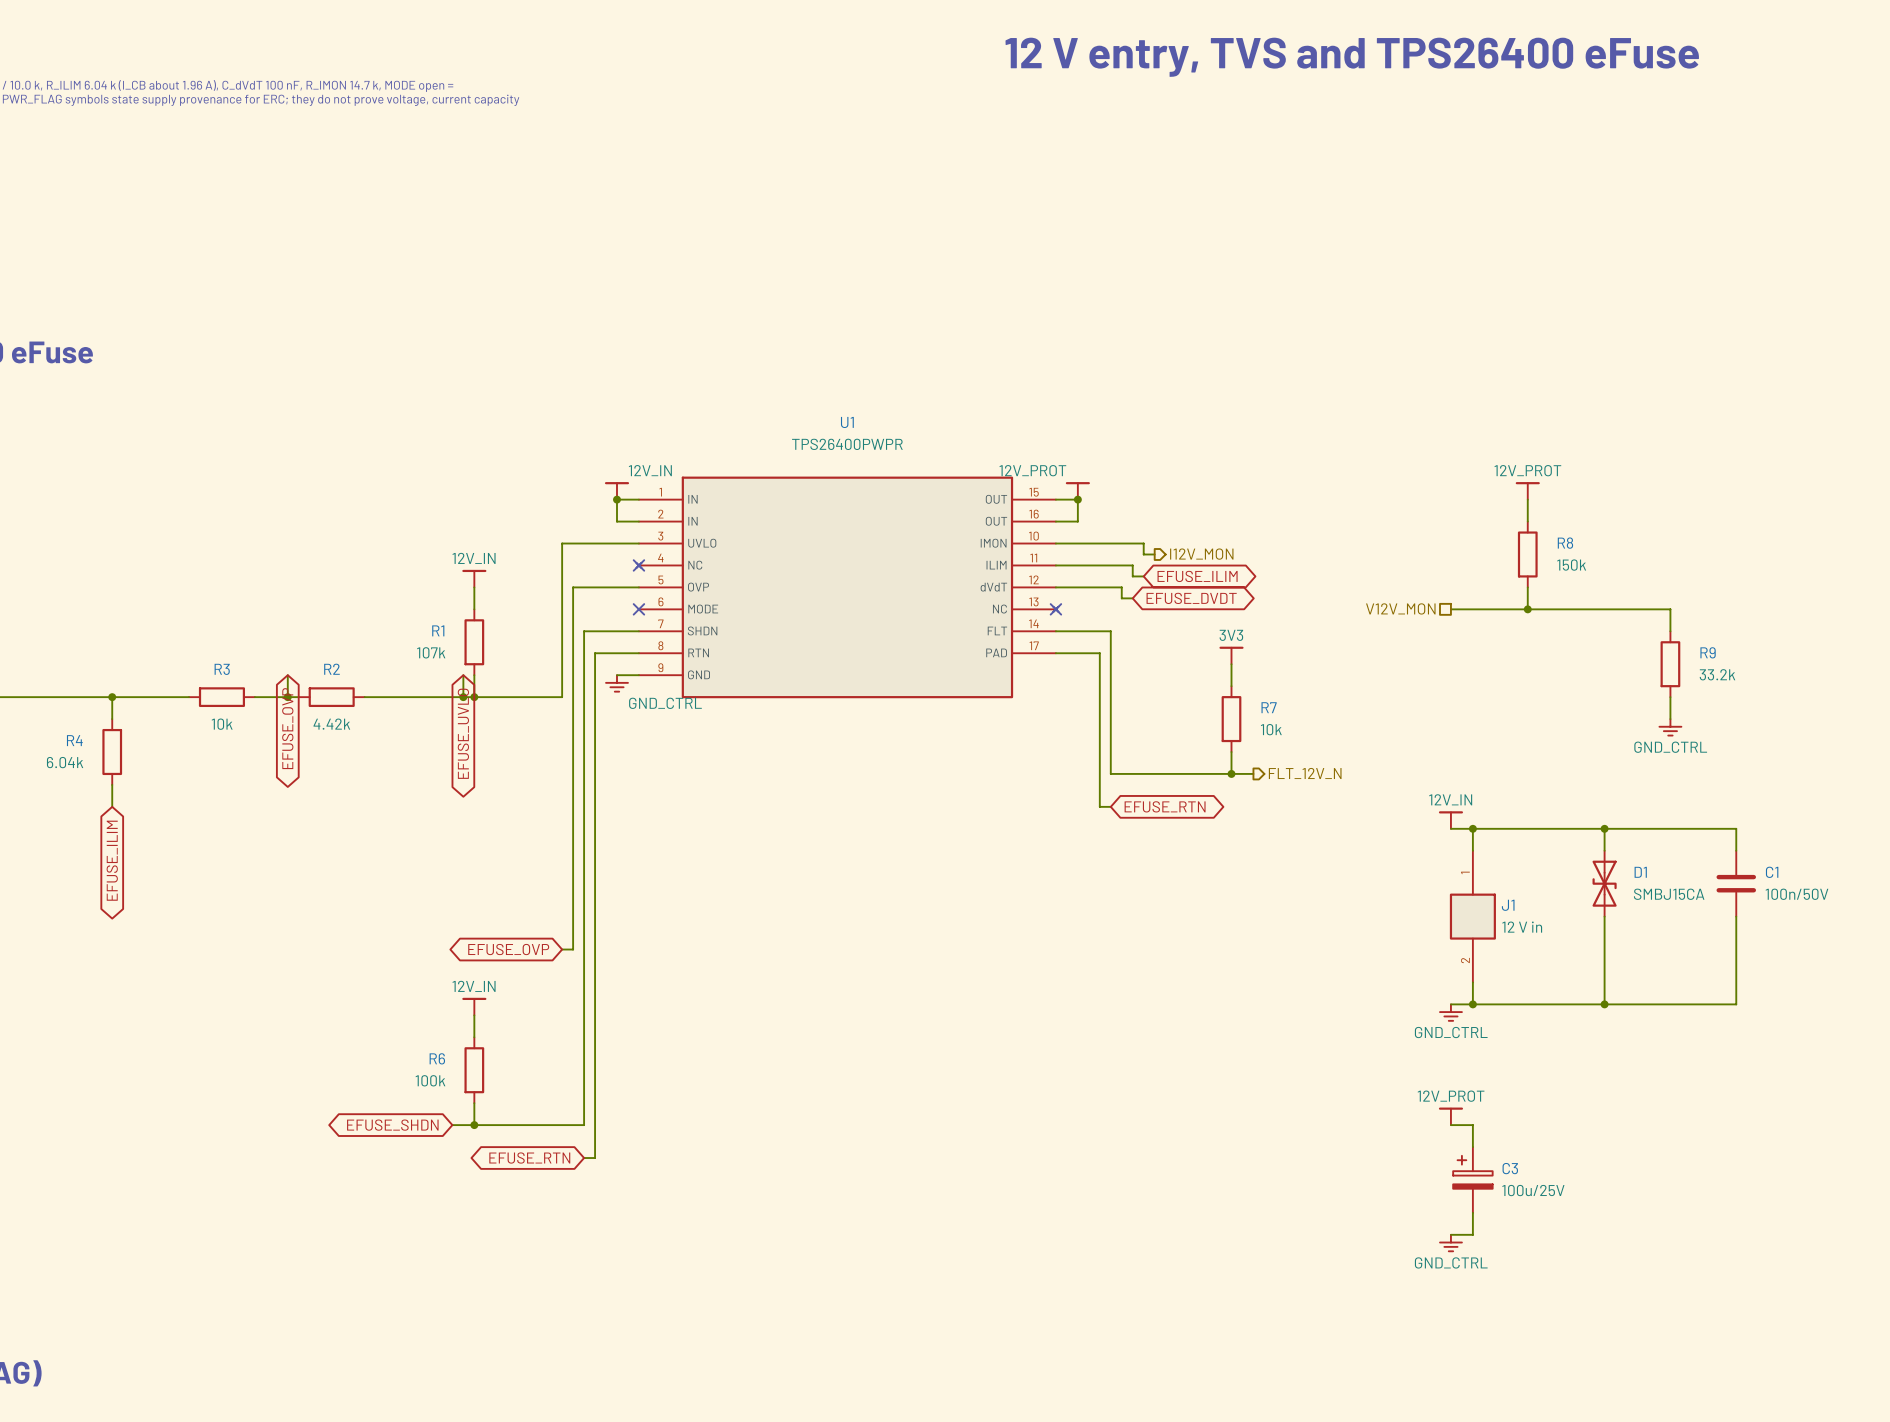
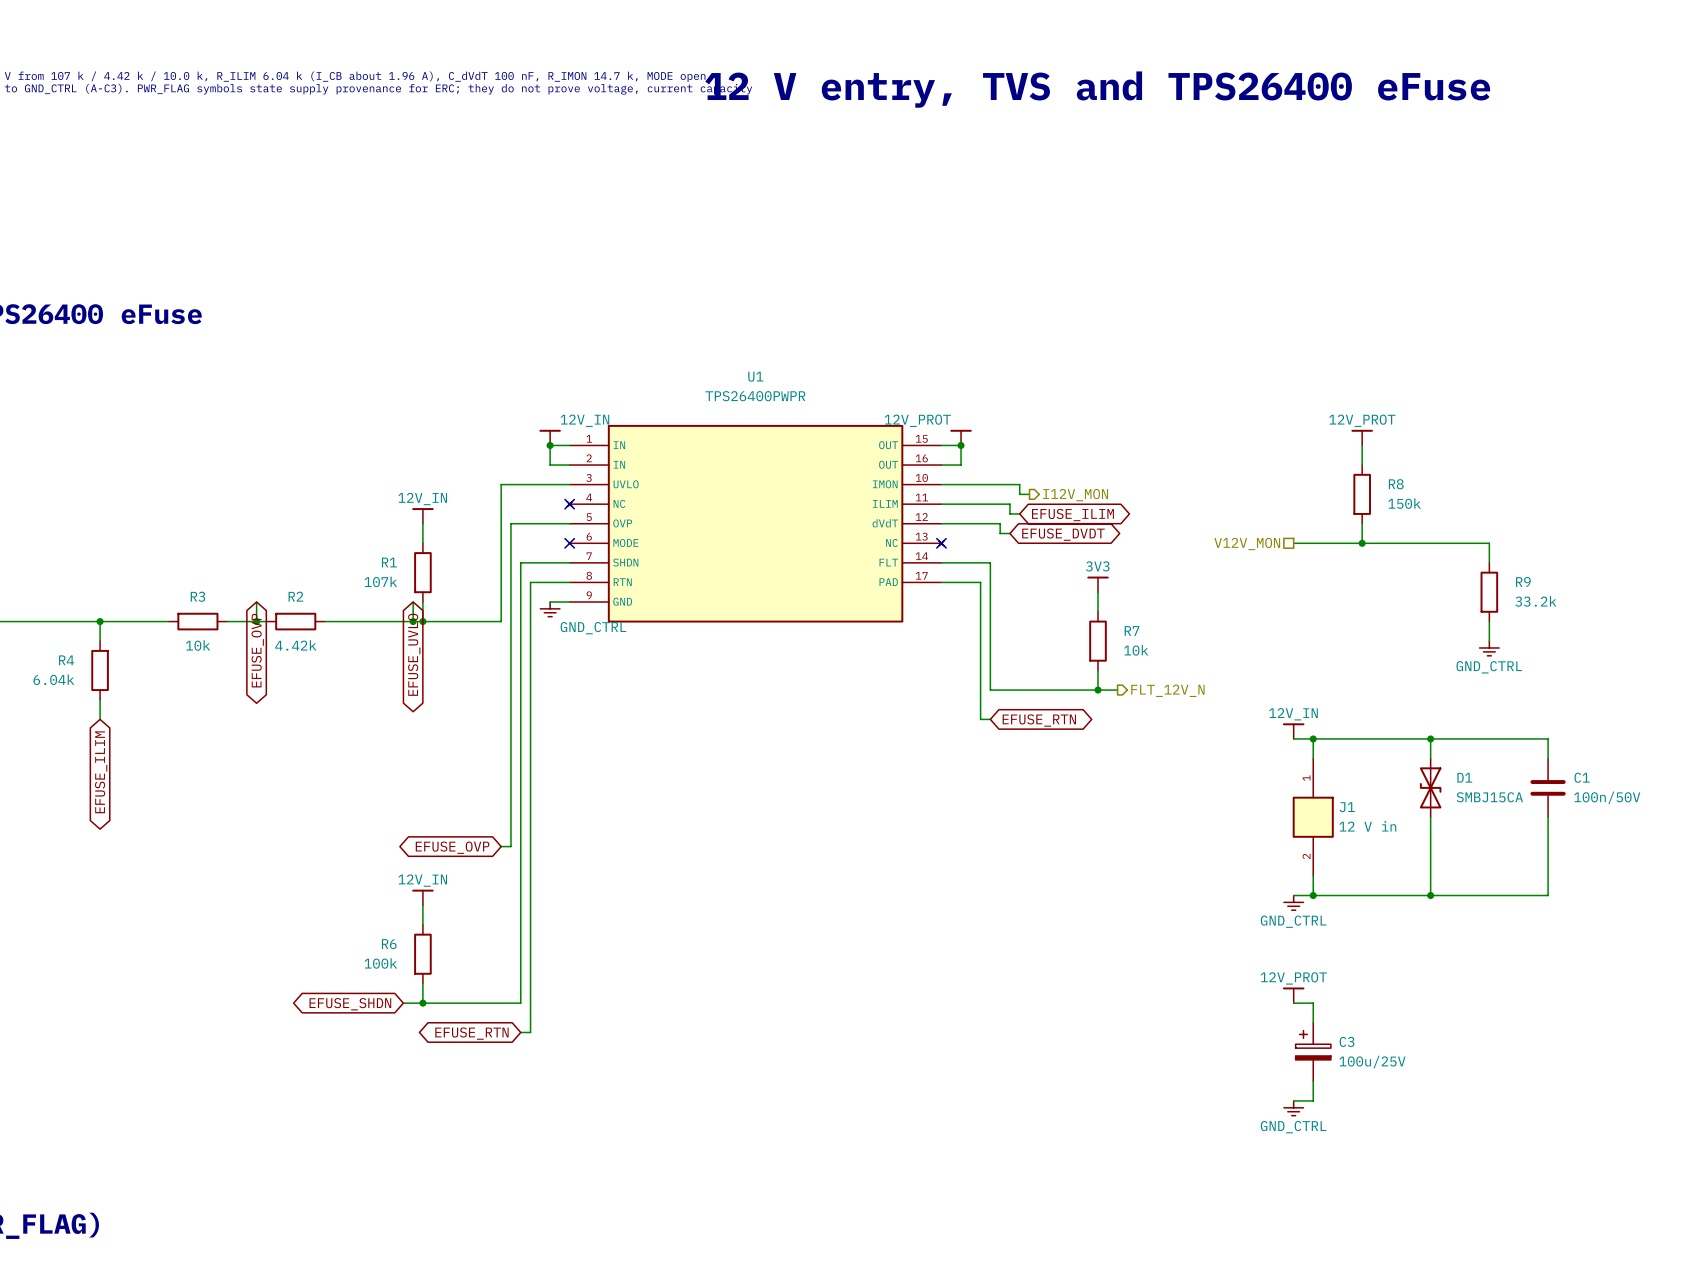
text position: 12 V entry, TVS and TPS26400 eFuse (1352, 57) -> 12 V entry, TVS and TPS26400 eFuse (1097, 89)

